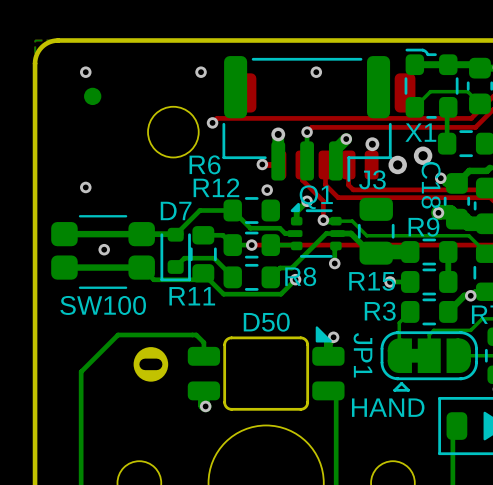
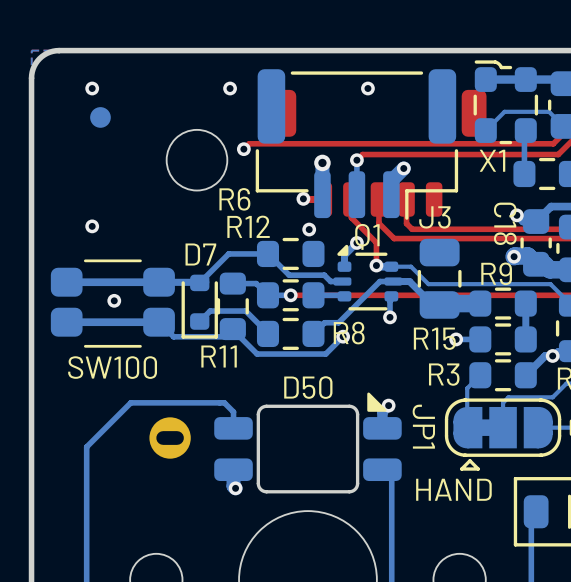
via: (372, 144) -> none
via: (423, 155) -> none
via: (397, 164) -> none

